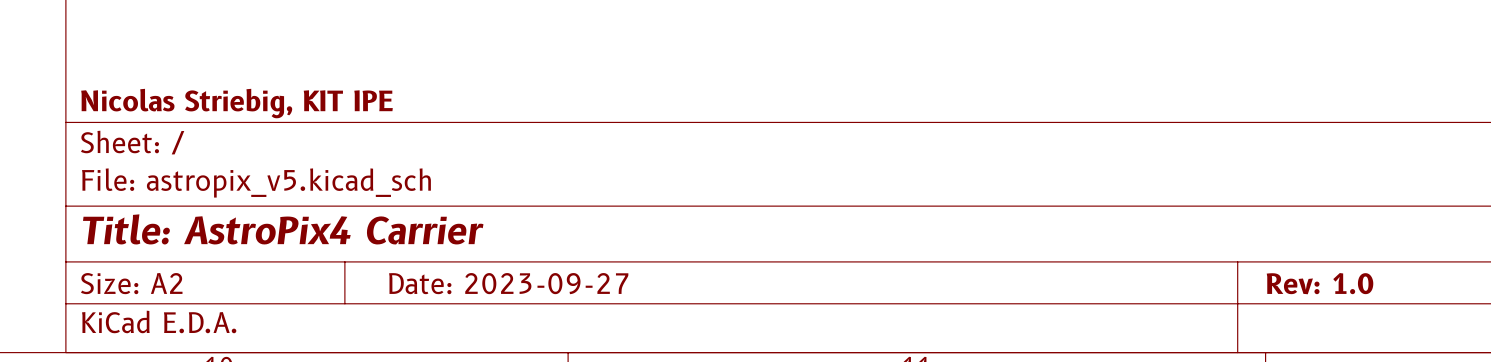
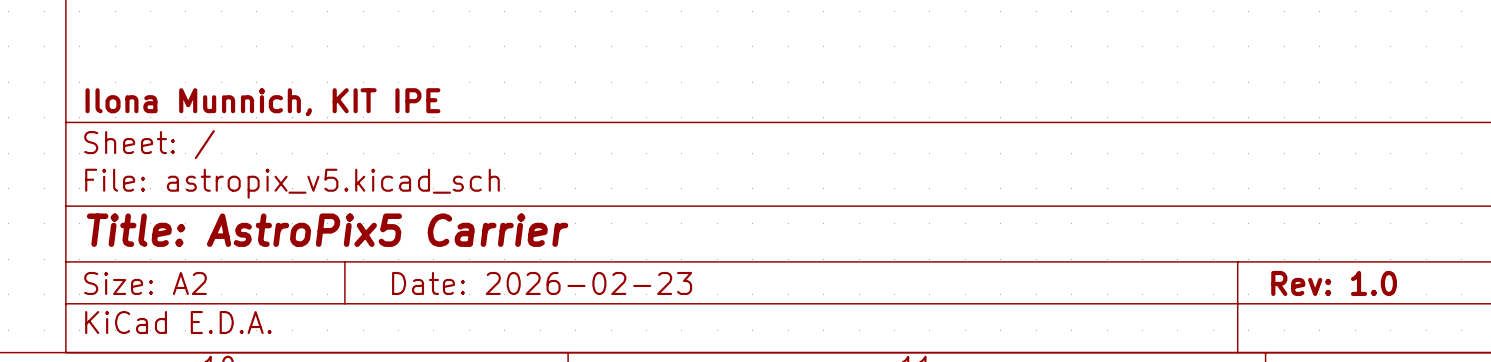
title block: Nicolas Striebig, KIT IPE (237, 103) -> Ilona Munnich, KIT IPE (262, 102)
title block: Title: AstroPix4 Carrier (283, 229) -> Title: AstroPix5 Carrier (327, 230)
title block: Date: 2023-09-27 (508, 283) -> Date: 2026-02-23 (542, 283)

